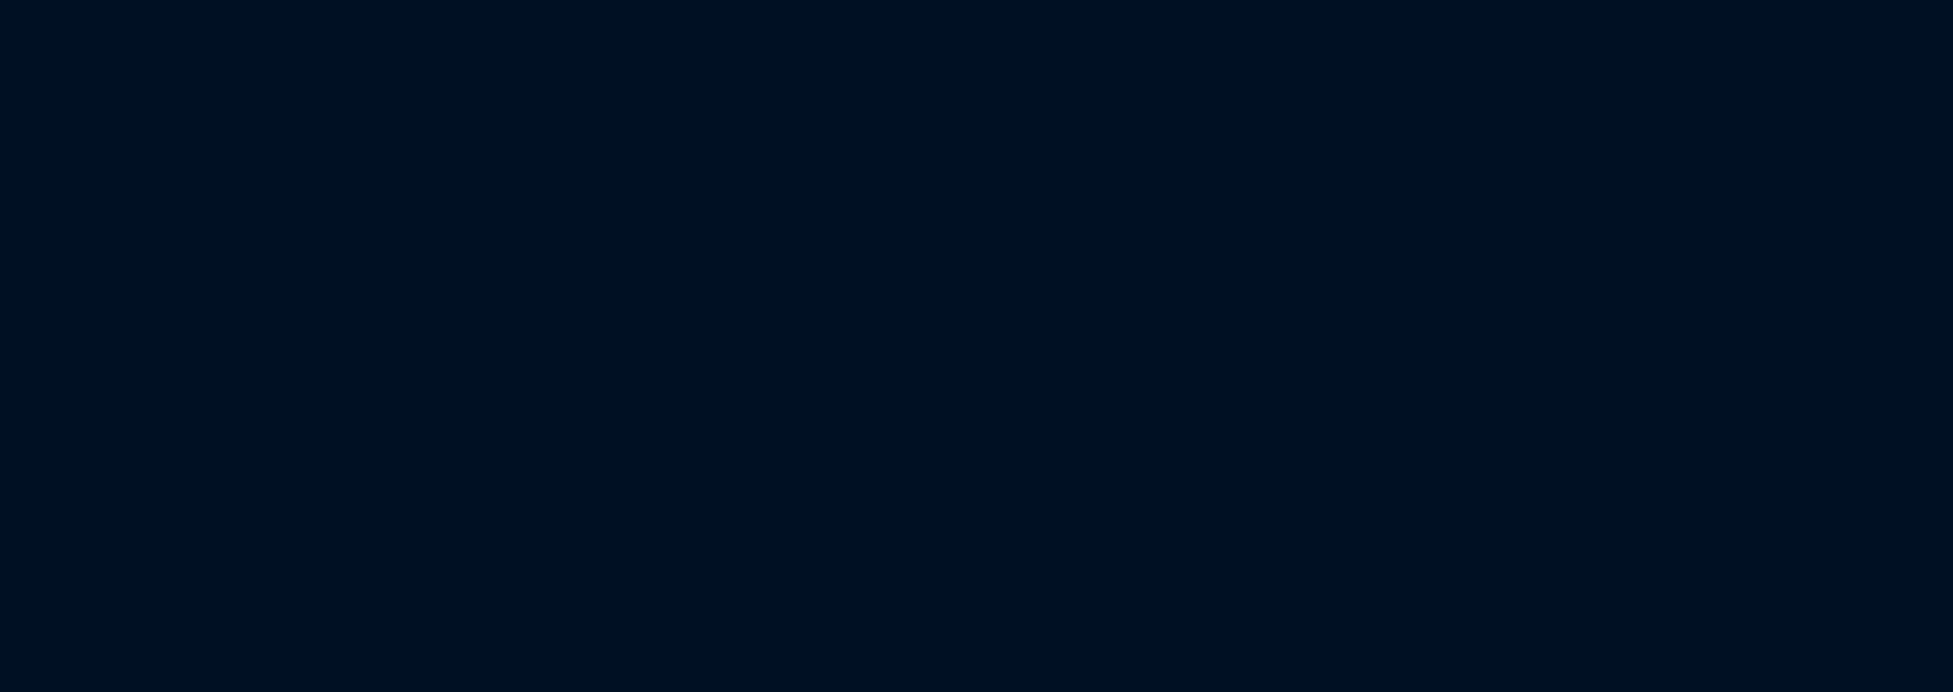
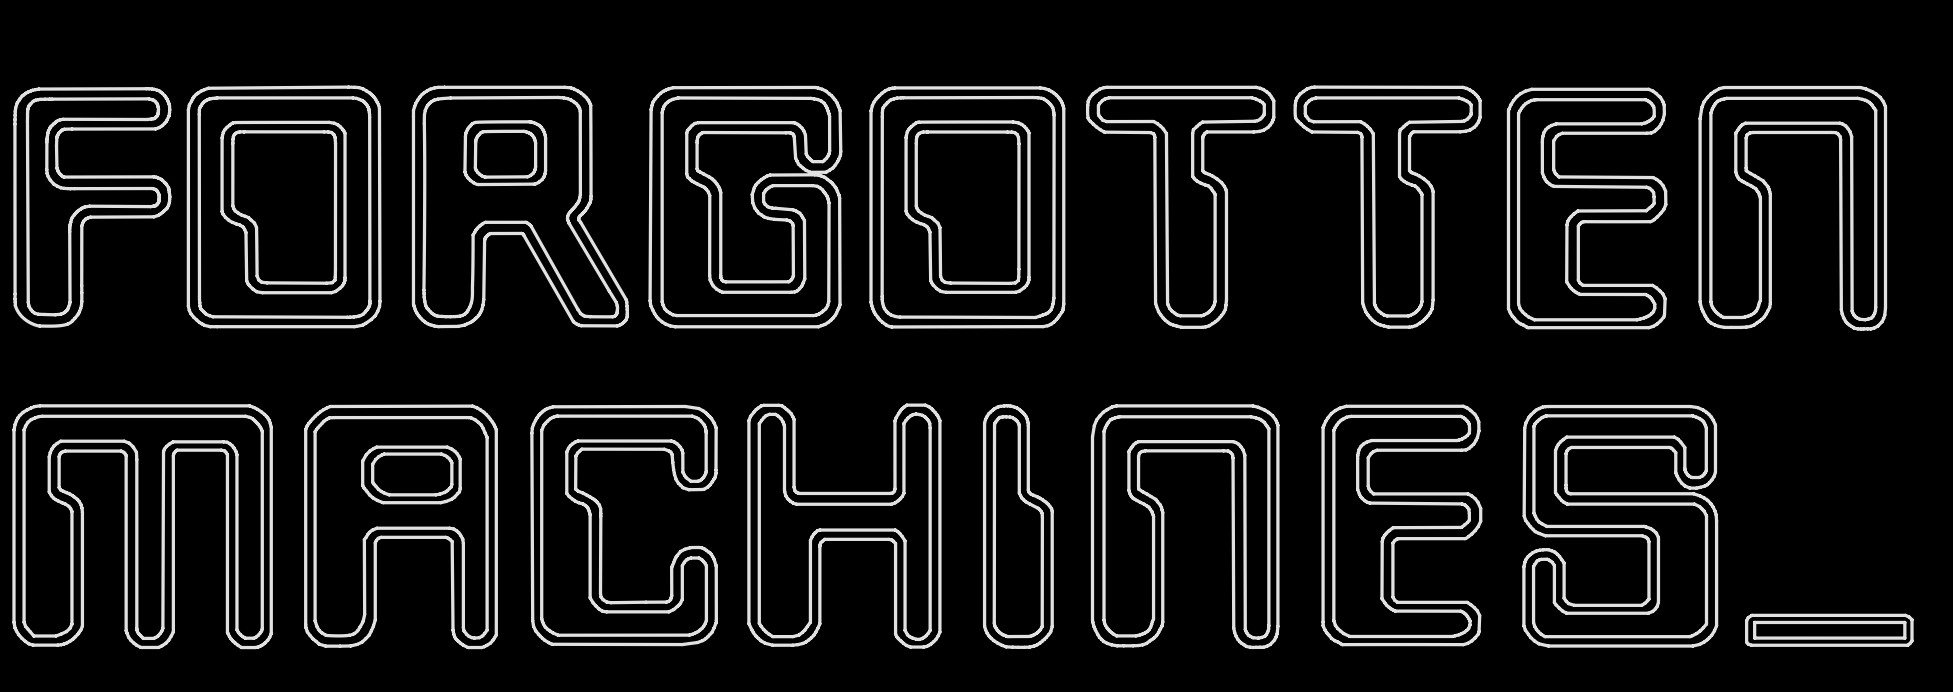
line: none -> (348, 87) (208, 88) (193, 97) (188, 109) (188, 306) (190, 313) (199, 322) (210, 326) (354, 326) (362, 325) (375, 315) (379, 301) (379, 107) (369, 93) (358, 87) (348, 87)
line: none -> (438, 87) (430, 89) (421, 94) (413, 110) (413, 304) (418, 315) (427, 323) (438, 326) (457, 326) (472, 320) (479, 314) (483, 305) (485, 238) (490, 233) (521, 233) (573, 321) (581, 325) (617, 325) (622, 323) (627, 316) (626, 299) (578, 219) (590, 199) (590, 105) (586, 97) (574, 89) (564, 87) (438, 87)
line: none -> (814, 87) (822, 89) (831, 95) (840, 110) (840, 155) (832, 168) (826, 172) (810, 172) (803, 168) (795, 158) (794, 136) (791, 133) (702, 132) (697, 138) (697, 168) (713, 180) (720, 192) (720, 277) (725, 281) (788, 281) (793, 275) (792, 223) (786, 220) (768, 218) (758, 213) (752, 202) (752, 194) (758, 182) (770, 175) (814, 174) (824, 177) (832, 182) (839, 198) (840, 304) (835, 315) (827, 322) (818, 326) (675, 326) (662, 321) (654, 313) (650, 300) (651, 109) (653, 101) (660, 93) (673, 87) (814, 87)
line: none -> (894, 87) (885, 90) (879, 95) (874, 101) (871, 111) (871, 302) (875, 314) (882, 322) (891, 326) (1043, 326) (1051, 324) (1061, 312) (1063, 304) (1063, 108) (1061, 101) (1051, 91) (1040, 87) (894, 87)
line: none -> (1107, 87) (1256, 87) (1266, 91) (1273, 100) (1272, 120) (1263, 130) (1206, 131) (1202, 136) (1202, 170) (1221, 182) (1226, 191) (1225, 305) (1221, 315) (1209, 325) (1202, 327) (1176, 326) (1167, 322) (1158, 311) (1155, 303) (1154, 135) (1150, 132) (1104, 132) (1090, 121) (1087, 113) (1089, 98) (1099, 89) (1107, 87)
line: none -> (1314, 87) (1307, 89) (1297, 98) (1295, 113) (1297, 120) (1311, 131) (1357, 132) (1361, 135) (1362, 303) (1365, 311) (1374, 321) (1383, 325) (1409, 327) (1416, 325) (1428, 315) (1432, 305) (1433, 191) (1428, 182) (1409, 170) (1409, 136) (1413, 131) (1469, 130) (1479, 119) (1480, 100) (1472, 91) (1462, 87) (1314, 87)
line: none -> (1724, 87) (1860, 87) (1876, 94) (1883, 101) (1885, 106) (1885, 307) (1883, 318) (1877, 326) (1870, 328) (1853, 328) (1847, 323) (1842, 313) (1840, 139) (1835, 132) (1752, 132) (1747, 134) (1746, 170) (1763, 181) (1770, 194) (1769, 307) (1764, 317) (1750, 326) (1719, 326) (1707, 318) (1700, 301) (1700, 118) (1704, 101) (1710, 93) (1724, 87)
line: none -> (1531, 89) (1648, 89) (1656, 93) (1662, 101) (1664, 113) (1662, 120) (1659, 127) (1651, 132) (1562, 133) (1553, 140) (1553, 169) (1558, 176) (1653, 177) (1662, 185) (1665, 191) (1665, 204) (1660, 213) (1651, 221) (1583, 221) (1578, 226) (1578, 280) (1580, 283) (1582, 285) (1652, 285) (1662, 293) (1665, 298) (1663, 317) (1653, 326) (1528, 327) (1516, 321) (1510, 312) (1508, 308) (1508, 110) (1516, 96) (1531, 89)
line: none -> (217, 97) (205, 100) (199, 109) (200, 308) (206, 314) (212, 316) (347, 317) (363, 314) (369, 303) (369, 117) (366, 104) (361, 100) (352, 97) (217, 97)
line: none -> (558, 97) (442, 98) (434, 100) (426, 106) (424, 118) (423, 290) (425, 305) (434, 314) (459, 316) (466, 312) (469, 307) (472, 296) (473, 234) (477, 228) (485, 222) (527, 223) (531, 226) (580, 313) (584, 316) (611, 316) (617, 313) (616, 302) (567, 218) (568, 214) (578, 202) (580, 194) (580, 111) (573, 101) (558, 97)
line: none -> (678, 97) (810, 98) (824, 103) (829, 116) (829, 150) (822, 161) (812, 161) (807, 156) (805, 134) (802, 128) (795, 123) (698, 122) (692, 125) (686, 132) (687, 177) (704, 187) (709, 195) (710, 280) (713, 285) (720, 291) (797, 290) (804, 278) (804, 220) (799, 213) (793, 209) (767, 206) (763, 201) (763, 193) (773, 185) (812, 185) (822, 189) (829, 202) (828, 301) (821, 312) (813, 315) (676, 315) (664, 308) (662, 301) (662, 112) (665, 103) (678, 97)
line: none -> (1033, 97) (1041, 98) (1048, 102) (1052, 107) (1054, 115) (1053, 298) (1051, 309) (1045, 314) (1035, 317) (899, 317) (890, 314) (884, 308) (882, 299) (883, 107) (890, 100) (897, 98) (1033, 97)
line: none -> (1109, 97) (1102, 100) (1098, 105) (1098, 115) (1102, 120) (1153, 121) (1166, 133) (1167, 303) (1177, 314) (1203, 315) (1211, 309) (1215, 301) (1215, 194) (1208, 185) (1197, 181) (1192, 176) (1193, 129) (1202, 122) (1257, 120) (1263, 115) (1264, 104) (1251, 97) (1109, 97)
line: none -> (1315, 97) (1458, 97) (1471, 104) (1470, 115) (1464, 120) (1409, 122) (1400, 129) (1399, 176) (1403, 181) (1415, 185) (1421, 194) (1421, 301) (1418, 309) (1410, 315) (1383, 314) (1374, 303) (1373, 133) (1360, 121) (1309, 120) (1305, 115) (1305, 105) (1309, 100) (1315, 97)
line: none -> (148, 98) (153, 100) (157, 105) (157, 114) (154, 118) (63, 119) (56, 121) (50, 127) (46, 140) (46, 169) (48, 176) (53, 184) (60, 187) (70, 188) (152, 188) (157, 191) (159, 200) (155, 205) (151, 206) (89, 206) (78, 210) (72, 217) (69, 226) (70, 302) (67, 308) (60, 314) (34, 313) (29, 306) (28, 302) (27, 121) (29, 105) (33, 101) (40, 99) (148, 98)
line: none -> (1726, 98) (1857, 98) (1867, 101) (1875, 110) (1875, 307) (1871, 317) (1859, 319) (1855, 316) (1852, 311) (1851, 136) (1845, 125) (1839, 123) (1745, 123) (1736, 132) (1736, 174) (1739, 179) (1755, 188) (1760, 198) (1760, 300) (1755, 311) (1742, 317) (1723, 317) (1713, 309) (1710, 301) (1710, 113) (1717, 101) (1726, 98)
line: none -> (1535, 99) (1525, 103) (1518, 113) (1518, 304) (1520, 308) (1534, 319) (1637, 319) (1648, 315) (1653, 311) (1654, 304) (1645, 294) (1580, 294) (1571, 288) (1566, 281) (1566, 224) (1569, 218) (1577, 210) (1646, 210) (1654, 203) (1653, 192) (1646, 187) (1552, 185) (1545, 179) (1542, 172) (1542, 142) (1545, 129) (1556, 123) (1646, 122) (1654, 116) (1653, 106) (1645, 99) (1535, 99)
line: none -> (529, 121) (472, 123) (465, 136) (464, 172) (468, 178) (478, 184) (534, 184) (542, 179) (545, 170) (545, 135) (539, 125) (529, 121)
line: none -> (329, 122) (337, 124) (345, 133) (344, 282) (340, 288) (331, 292) (256, 291) (246, 280) (245, 232) (242, 226) (228, 220) (222, 211) (223, 132) (233, 122) (329, 122)
line: none -> (919, 122) (909, 128) (906, 137) (906, 211) (912, 219) (926, 226) (929, 232) (931, 283) (940, 291) (946, 292) (1019, 291) (1026, 285) (1028, 280) (1027, 130) (1021, 124) (1013, 121) (919, 122)
line: none -> (61, 130) (155, 128) (166, 121) (169, 106) (162, 93) (149, 88) (38, 89) (25, 93) (17, 103) (14, 124) (15, 305) (24, 319) (39, 326) (66, 324) (71, 321) (79, 312) (81, 301) (81, 225) (85, 219) (90, 217) (153, 216) (167, 208) (169, 201) (168, 188) (162, 179) (156, 177) (61, 176) (56, 168) (56, 145) (57, 136) (61, 130)
line: none -> (244, 131) (328, 131) (333, 134) (335, 143) (335, 269) (334, 280) (332, 282) (267, 282) (258, 280) (257, 276) (256, 227) (248, 217) (235, 210) (232, 205) (233, 136) (235, 133) (244, 131)
line: none -> (523, 131) (530, 134) (535, 141) (535, 166) (533, 173) (527, 176) (485, 177) (477, 172) (475, 167) (475, 141) (480, 132) (523, 131)
line: none -> (923, 132) (919, 133) (916, 139) (916, 206) (918, 211) (931, 217) (939, 227) (940, 276) (942, 280) (950, 283) (1015, 282) (1018, 280) (1018, 269) (1018, 143) (1017, 134) (1011, 132) (923, 132)
line: none -> (40, 405) (23, 412) (17, 417) (13, 430) (13, 622) (16, 630) (21, 638) (33, 645) (61, 644) (73, 639) (82, 626) (82, 508) (77, 499) (59, 487) (59, 456) (61, 452) (121, 451) (126, 455) (126, 630) (130, 640) (140, 647) (158, 647) (165, 643) (173, 631) (173, 453) (177, 450) (221, 450) (227, 454) (227, 632) (232, 641) (241, 647) (258, 647) (265, 643) (271, 633) (271, 427) (266, 416) (249, 405) (40, 405)
line: none -> (763, 405) (781, 405) (791, 413) (794, 419) (794, 487) (794, 490) (799, 493) (892, 492) (894, 488) (896, 417) (906, 405) (925, 405) (936, 414) (939, 420) (939, 632) (931, 643) (923, 647) (910, 647) (903, 643) (895, 634) (895, 543) (889, 539) (824, 539) (820, 542) (819, 623) (813, 635) (806, 641) (792, 645) (772, 645) (761, 640) (753, 632) (748, 623) (748, 420) (755, 409) (763, 405)
line: none -> (1004, 405) (1017, 408) (1026, 417) (1028, 425) (1028, 490) (1030, 494) (1046, 503) (1052, 511) (1052, 626) (1050, 631) (1044, 639) (1029, 647) (1002, 645) (989, 636) (984, 625) (984, 423) (990, 412) (997, 407) (1004, 405)
line: none -> (1116, 405) (1252, 405) (1268, 412) (1275, 420) (1277, 425) (1277, 626) (1276, 636) (1270, 644) (1263, 647) (1246, 646) (1239, 641) (1234, 632) (1233, 458) (1228, 450) (1145, 450) (1139, 453) (1138, 489) (1155, 499) (1162, 512) (1162, 625) (1156, 635) (1142, 644) (1111, 644) (1099, 637) (1092, 620) (1092, 437) (1096, 419) (1103, 412) (1116, 405)
line: none -> (472, 406) (486, 414) (496, 429) (496, 635) (494, 637) (484, 646) (468, 647) (454, 636) (452, 541) (450, 539) (445, 537) (381, 537) (375, 542) (375, 619) (369, 635) (362, 642) (350, 645) (325, 646) (319, 644) (307, 631) (305, 624) (305, 429) (308, 423) (320, 411) (330, 406) (472, 406)
line: none -> (685, 406) (703, 410) (711, 418) (716, 427) (716, 473) (707, 487) (702, 489) (682, 487) (676, 479) (672, 454) (664, 449) (581, 449) (575, 456) (575, 489) (594, 500) (600, 508) (600, 593) (603, 599) (610, 602) (668, 601) (671, 595) (671, 567) (675, 557) (684, 549) (701, 547) (710, 553) (716, 566) (716, 620) (711, 632) (702, 640) (682, 644) (552, 644) (548, 642) (535, 631) (532, 620) (531, 433) (535, 420) (545, 409) (553, 406) (685, 406)
line: none -> (1346, 406) (1331, 413) (1323, 427) (1323, 625) (1324, 629) (1331, 638) (1342, 644) (1467, 643) (1478, 634) (1479, 615) (1477, 610) (1467, 602) (1397, 602) (1394, 600) (1392, 597) (1392, 543) (1398, 538) (1466, 538) (1475, 530) (1480, 521) (1480, 508) (1477, 502) (1467, 493) (1373, 493) (1368, 486) (1368, 457) (1376, 450) (1466, 449) (1473, 444) (1477, 437) (1478, 430) (1477, 418) (1470, 410) (1463, 406) (1346, 406)
line: none -> (1545, 406) (1690, 406) (1703, 409) (1711, 416) (1715, 425) (1715, 472) (1709, 482) (1700, 487) (1689, 488) (1681, 483) (1675, 472) (1675, 452) (1669, 447) (1571, 447) (1566, 453) (1566, 488) (1569, 493) (1693, 493) (1704, 498) (1710, 503) (1714, 510) (1716, 520) (1716, 625) (1711, 635) (1704, 641) (1692, 646) (1548, 646) (1534, 640) (1525, 630) (1523, 566) (1527, 556) (1536, 550) (1548, 549) (1554, 552) (1564, 563) (1564, 598) (1568, 603) (1574, 605) (1641, 605) (1648, 599) (1648, 541) (1645, 537) (1545, 535) (1535, 531) (1525, 520) (1524, 428) (1530, 414) (1536, 410) (1545, 406)
line: none -> (915, 413) (910, 415) (903, 423) (903, 493) (900, 498) (891, 504) (793, 503) (787, 498) (784, 491) (784, 426) (782, 421) (775, 414) (769, 414) (759, 423) (759, 623) (768, 634) (772, 636) (799, 635) (810, 622) (810, 540) (814, 532) (820, 530) (895, 530) (897, 531) (905, 540) (905, 630) (909, 636) (919, 639) (930, 630) (930, 427) (925, 417) (915, 413)
line: none -> (1546, 415) (1692, 415) (1703, 421) (1706, 427) (1706, 470) (1699, 477) (1691, 477) (1685, 472) (1684, 447) (1674, 437) (1566, 437) (1558, 444) (1555, 450) (1555, 492) (1567, 504) (1694, 504) (1704, 511) (1706, 515) (1706, 624) (1696, 633) (1689, 636) (1545, 636) (1536, 629) (1533, 622) (1533, 566) (1537, 560) (1541, 559) (1548, 559) (1554, 565) (1554, 602) (1566, 613) (1648, 613) (1655, 608) (1658, 602) (1658, 537) (1650, 528) (1644, 526) (1546, 526) (1536, 519) (1533, 513) (1533, 426) (1539, 419) (1546, 415)
line: none -> (42, 416) (245, 416) (255, 421) (262, 431) (262, 628) (258, 635) (254, 638) (245, 638) (236, 629) (236, 454) (232, 445) (223, 441) (173, 441) (164, 449) (162, 628) (155, 637) (143, 638) (136, 628) (136, 452) (129, 443) (124, 441) (60, 441) (51, 448) (49, 456) (49, 491) (55, 499) (68, 506) (71, 511) (71, 624) (66, 631) (56, 635) (33, 635) (24, 622) (24, 429) (31, 419) (42, 416)
line: none -> (556, 416) (547, 421) (541, 430) (541, 618) (545, 627) (558, 635) (689, 635) (697, 631) (706, 620) (706, 565) (699, 558) (688, 558) (682, 565) (682, 599) (679, 604) (668, 611) (606, 611) (599, 609) (593, 602) (590, 597) (590, 514) (586, 506) (575, 501) (566, 493) (566, 451) (570, 445) (577, 440) (671, 440) (677, 443) (681, 449) (684, 475) (690, 481) (697, 481) (703, 477) (706, 471) (706, 432) (703, 424) (692, 416) (556, 416)
line: none -> (1002, 416) (998, 418) (994, 425) (994, 623) (997, 629) (1006, 636) (1028, 636) (1036, 633) (1042, 626) (1042, 513) (1037, 508) (1023, 499) (1019, 493) (1019, 425) (1012, 417) (1002, 416)
line: none -> (1119, 416) (1250, 416) (1260, 419) (1268, 428) (1268, 625) (1264, 636) (1253, 637) (1248, 635) (1245, 629) (1244, 455) (1238, 444) (1233, 441) (1138, 441) (1129, 451) (1129, 493) (1132, 497) (1148, 507) (1153, 516) (1153, 618) (1149, 629) (1135, 635) (1116, 635) (1106, 627) (1104, 620) (1104, 431) (1110, 419) (1119, 416)
line: none -> (1349, 416) (1341, 420) (1333, 430) (1333, 620) (1335, 625) (1349, 636) (1452, 636) (1464, 632) (1468, 628) (1470, 620) (1460, 611) (1395, 611) (1386, 605) (1381, 598) (1382, 541) (1384, 535) (1393, 527) (1461, 527) (1469, 520) (1468, 509) (1461, 503) (1367, 502) (1360, 496) (1357, 489) (1357, 458) (1361, 446) (1371, 440) (1461, 439) (1469, 433) (1468, 423) (1460, 416) (1349, 416)
line: none -> (334, 417) (323, 421) (315, 431) (315, 620) (318, 630) (326, 635) (349, 635) (356, 632) (362, 623) (364, 614) (364, 539) (369, 532) (376, 528) (449, 528) (458, 532) (463, 543) (463, 630) (471, 637) (482, 635) (487, 630) (487, 437) (481, 425) (475, 419) (468, 417) (334, 417)
line: none -> (376, 447) (447, 447) (451, 449) (460, 459) (459, 491) (451, 499) (440, 502) (383, 502) (377, 500) (369, 495) (362, 485) (362, 461) (370, 450) (376, 447)
line: none -> (384, 454) (445, 455) (451, 462) (451, 486) (444, 492) (436, 494) (389, 494) (384, 493) (372, 482) (372, 464) (378, 456) (384, 454)
line: none -> (1751, 615) (1746, 620) (1746, 642) (1751, 645) (1907, 645) (1912, 640) (1912, 619) (1905, 615) (1752, 615)
line: none -> (1754, 622) (1904, 622) (1904, 638) (1754, 638) (1754, 622)

